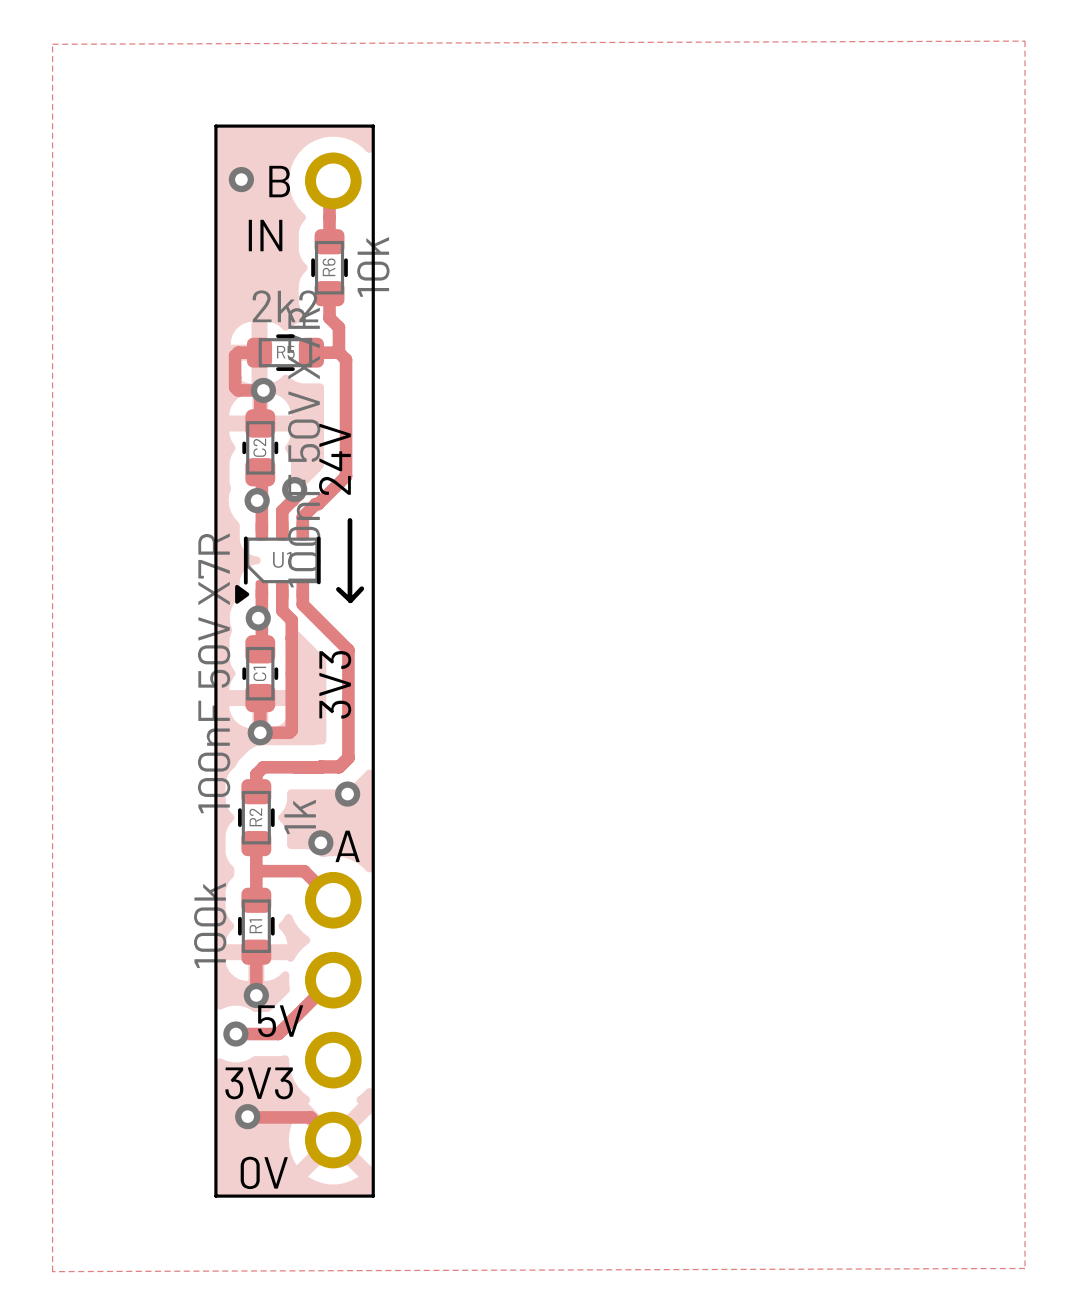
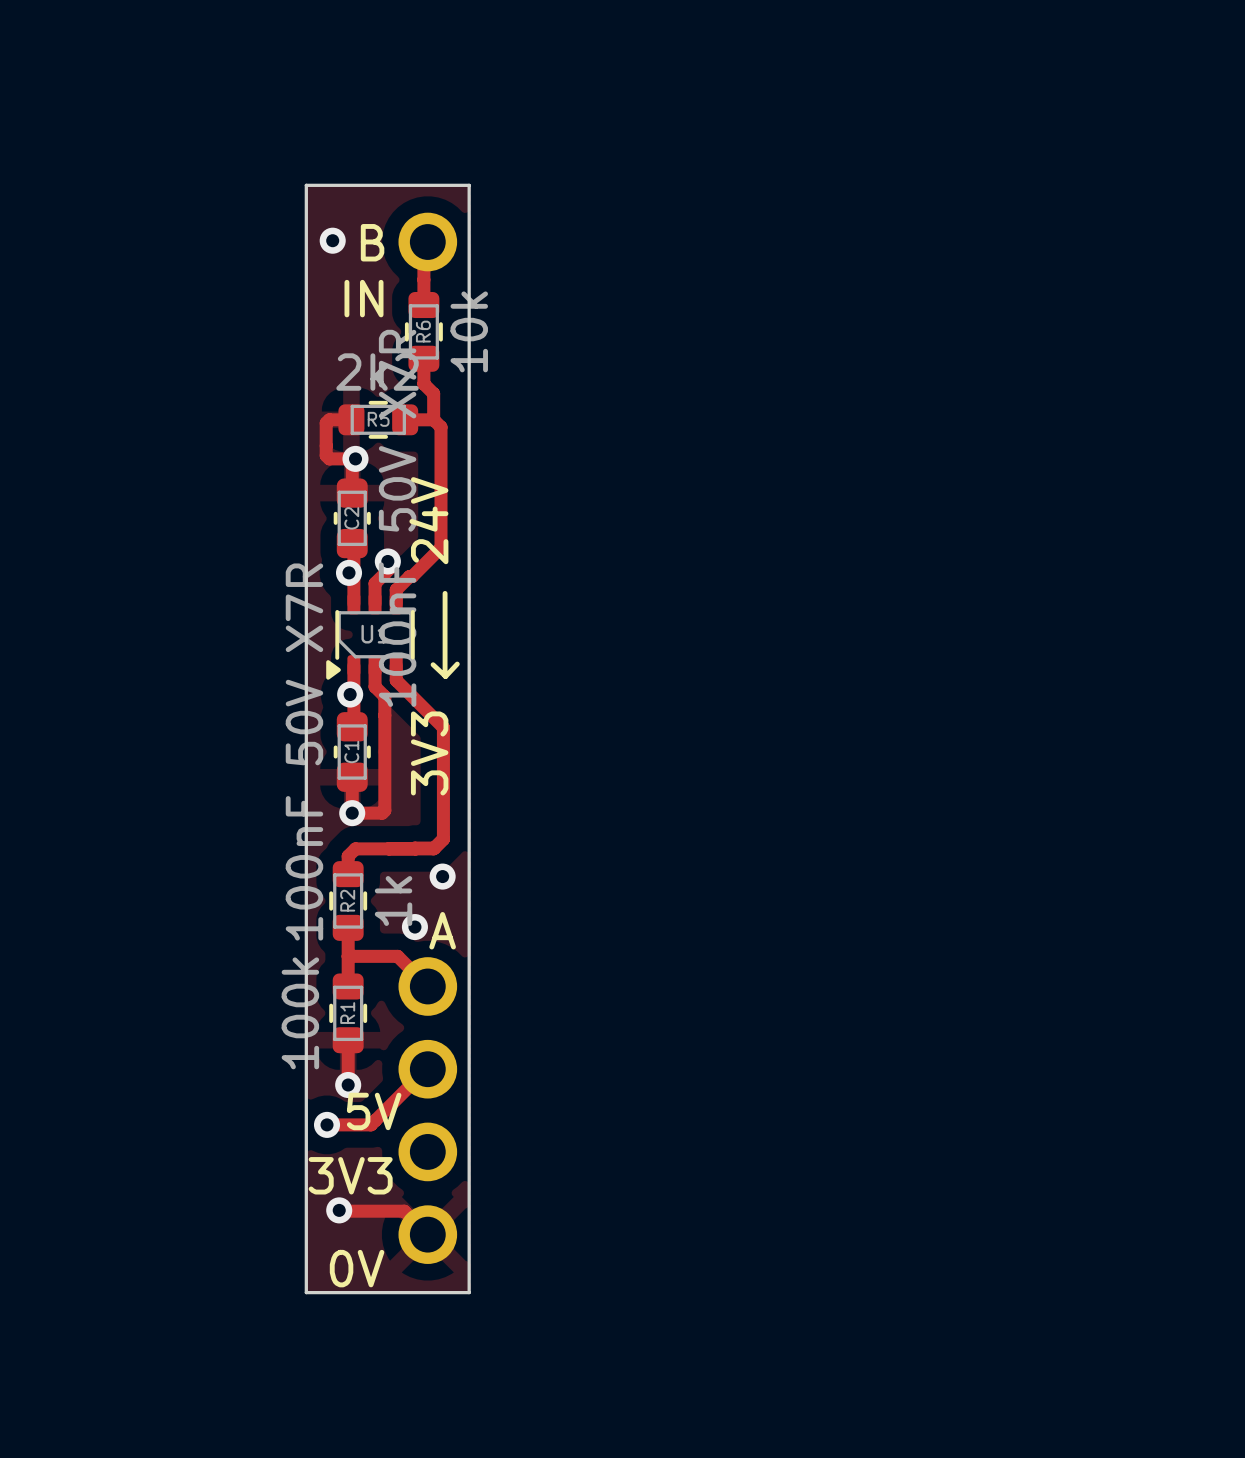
zone outline: (1025, 41) (52, 44) (52, 1271) (1025, 1268) (1025, 41) -> none

